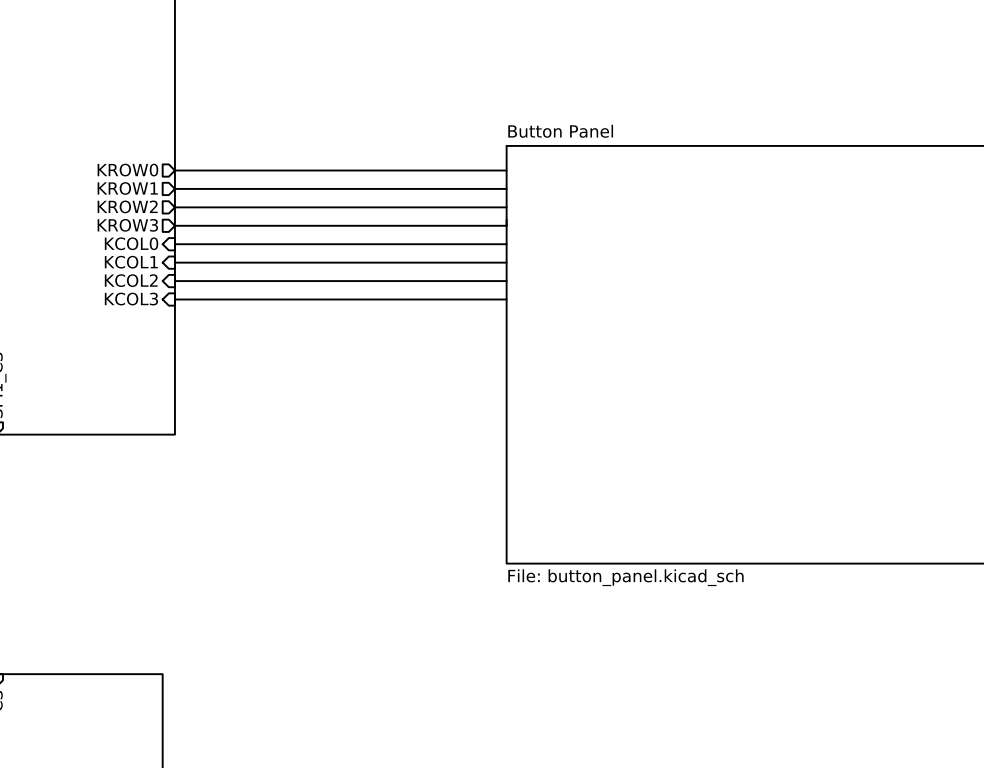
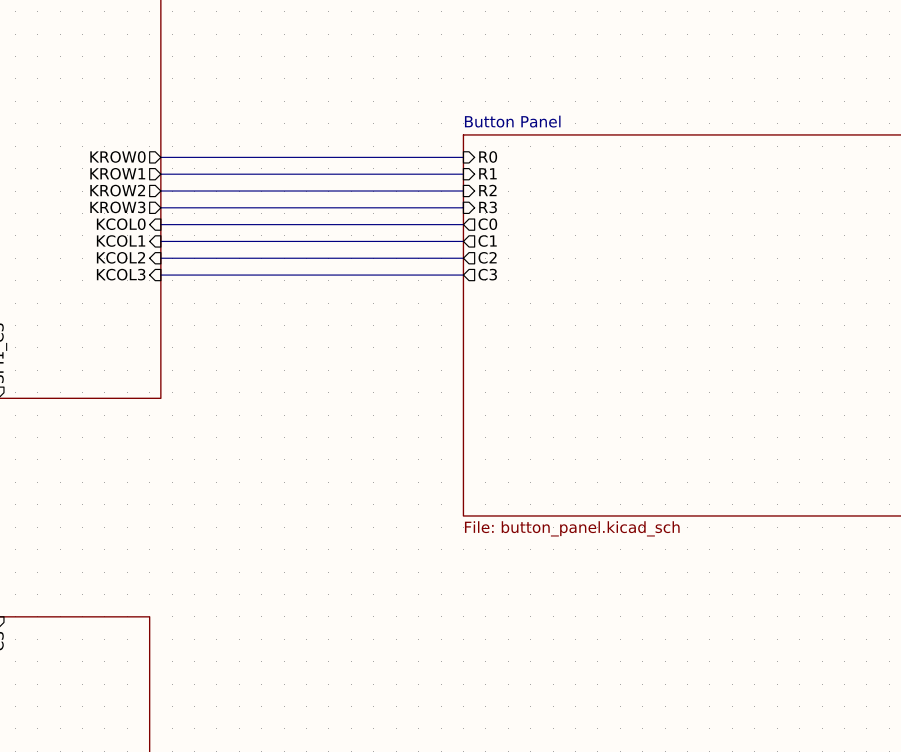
sheet pin: none -> R0 (488, 156)
sheet pin: none -> R1 (487, 173)
sheet pin: none -> R2 (487, 190)
sheet pin: none -> R3 (488, 207)
sheet pin: none -> C0 (487, 224)
sheet pin: none -> C1 (487, 241)
sheet pin: none -> C2 (487, 257)
sheet pin: none -> C3 (487, 274)

